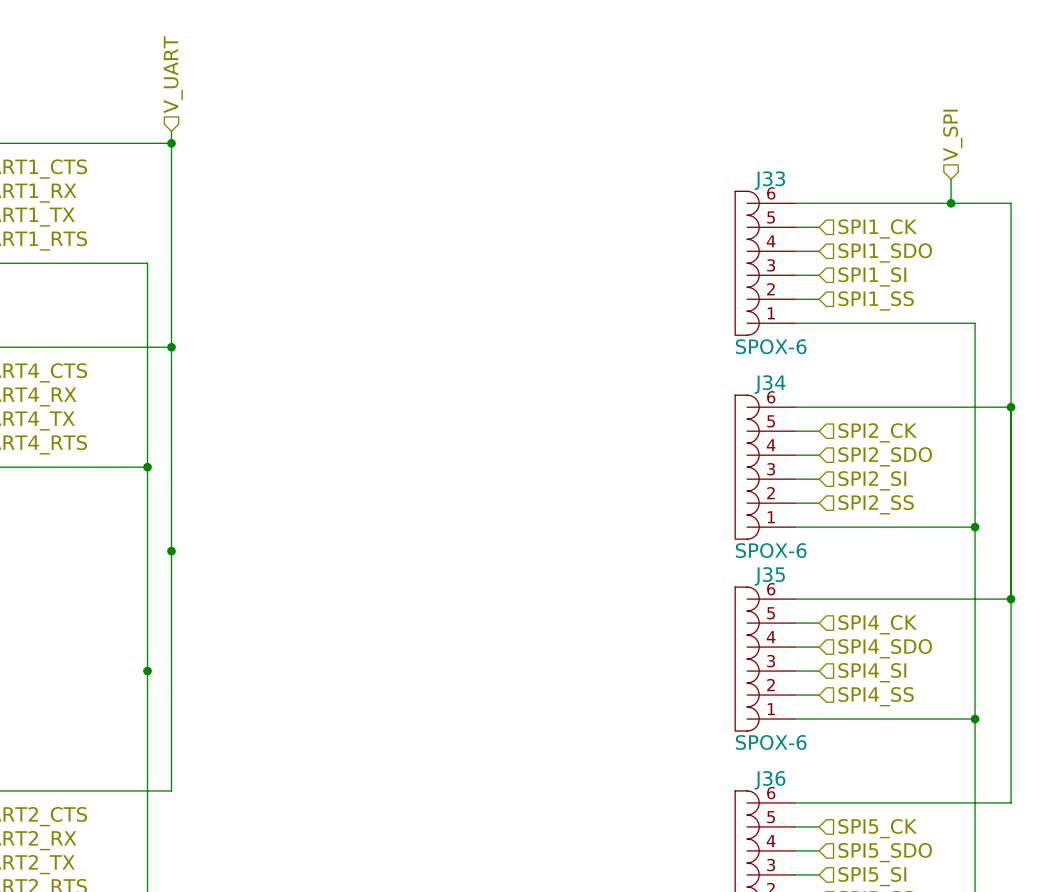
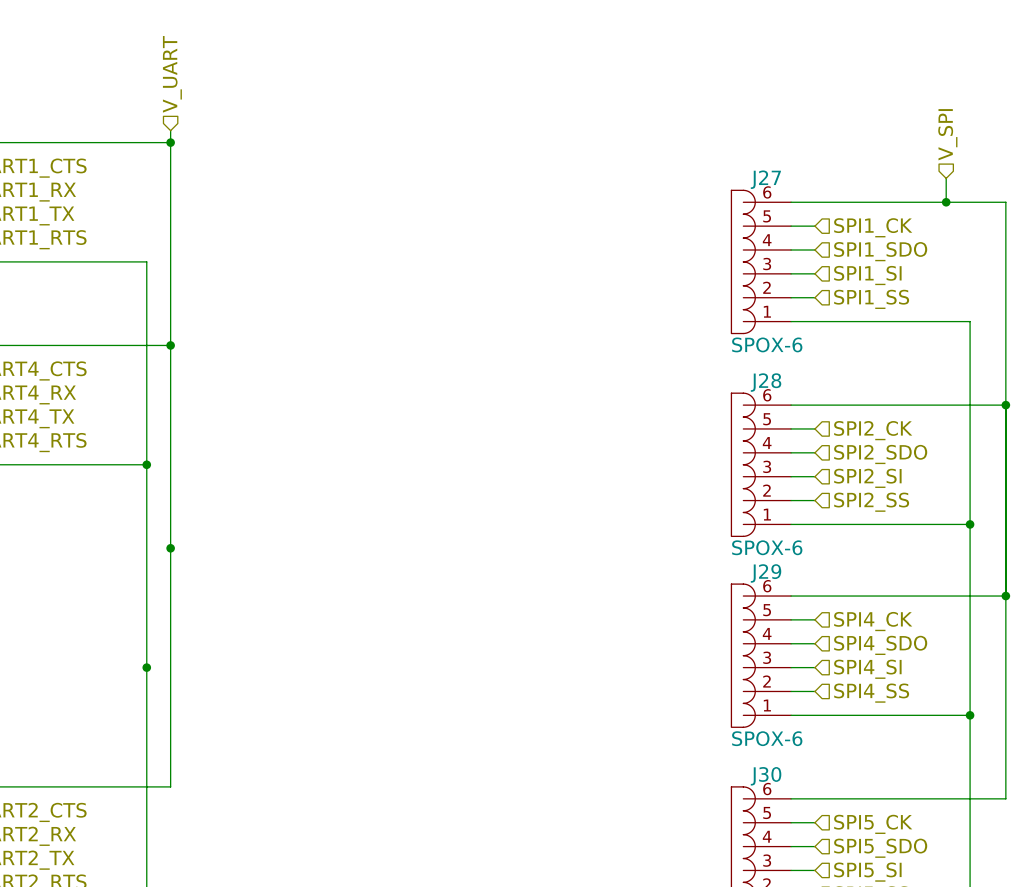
J33 name: J33 (769, 180) -> J27 (765, 179)
J34 name: J34 (770, 384) -> J28 (766, 382)
J35 name: J35 (769, 576) -> J29 (766, 573)
J36 name: J36 (770, 780) -> J30 (766, 776)

